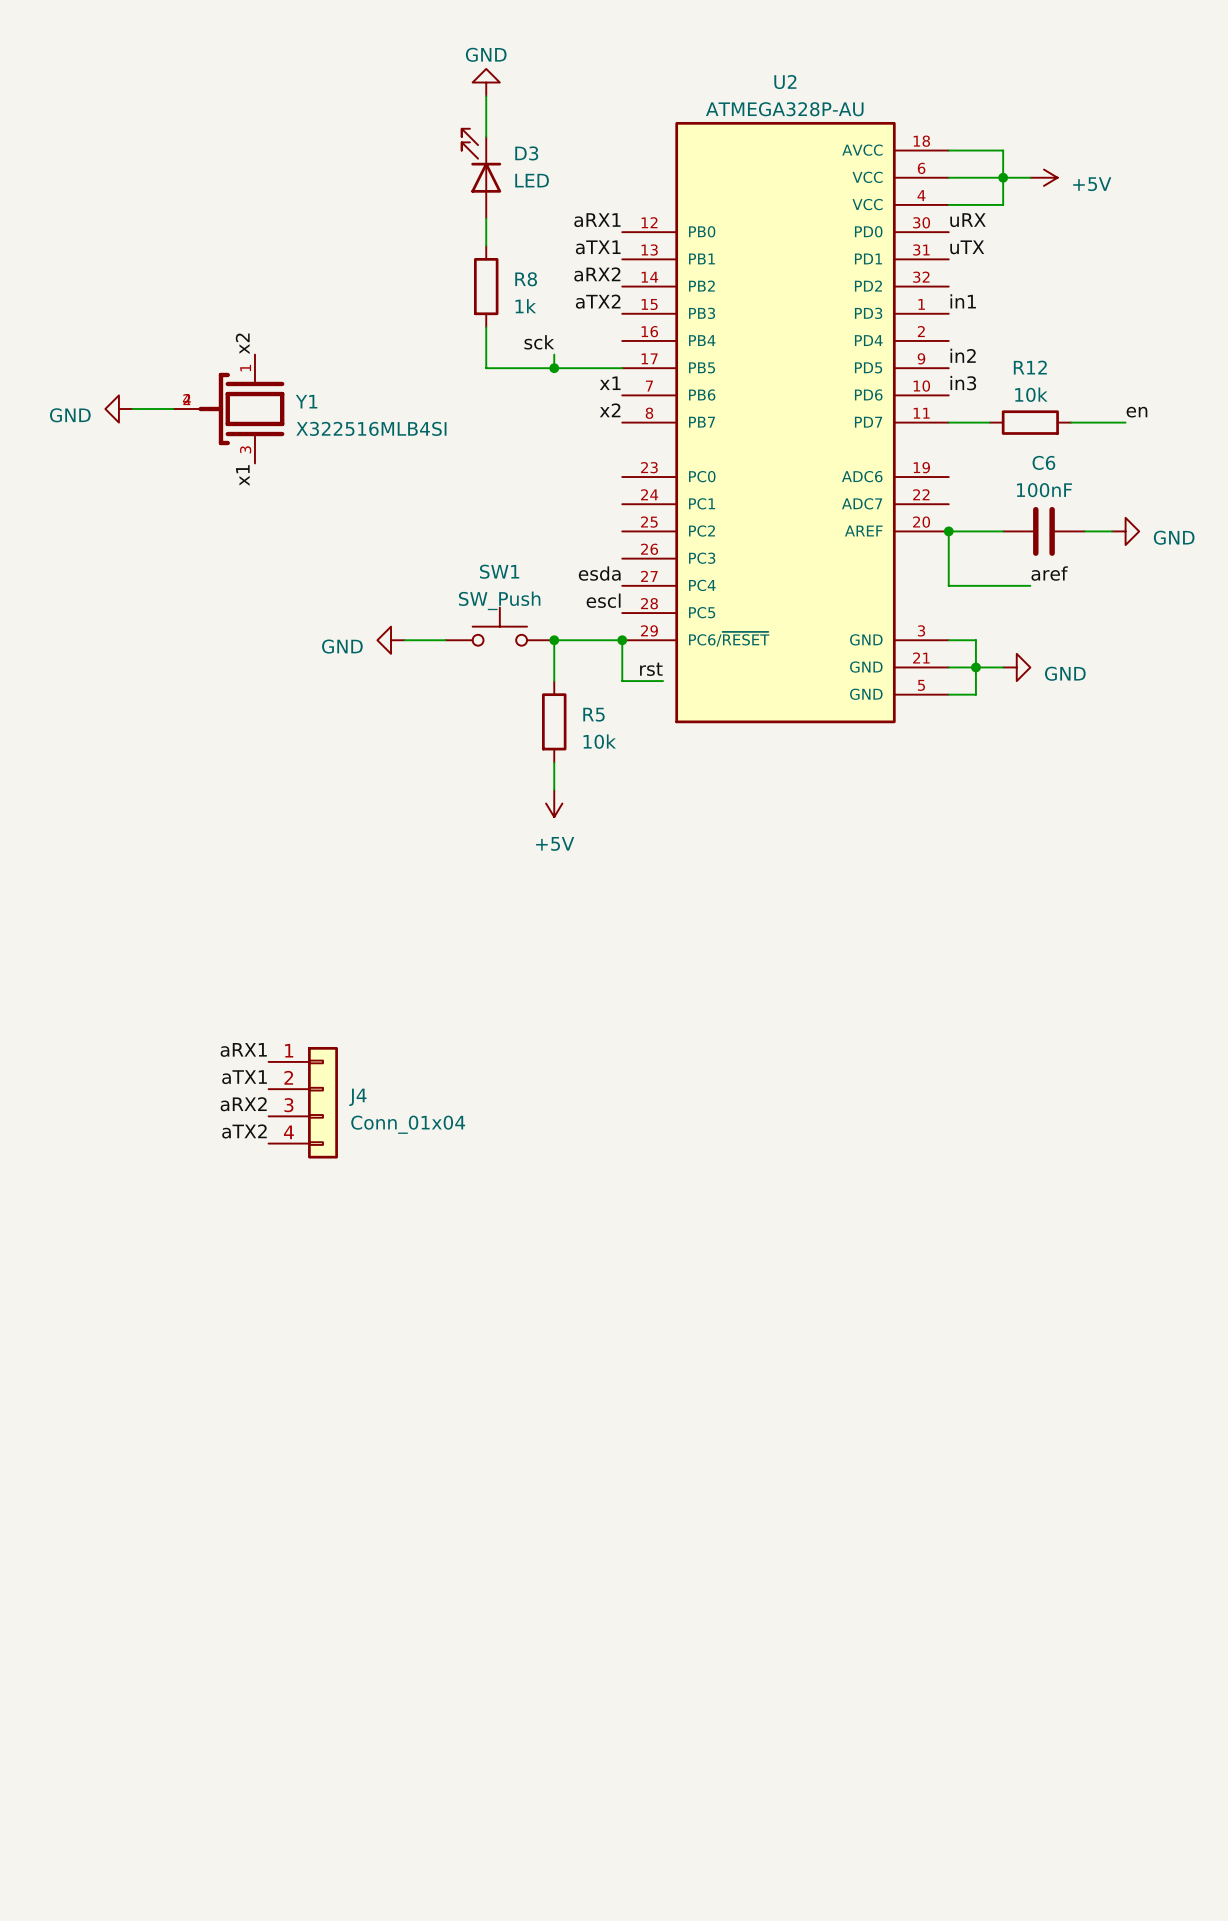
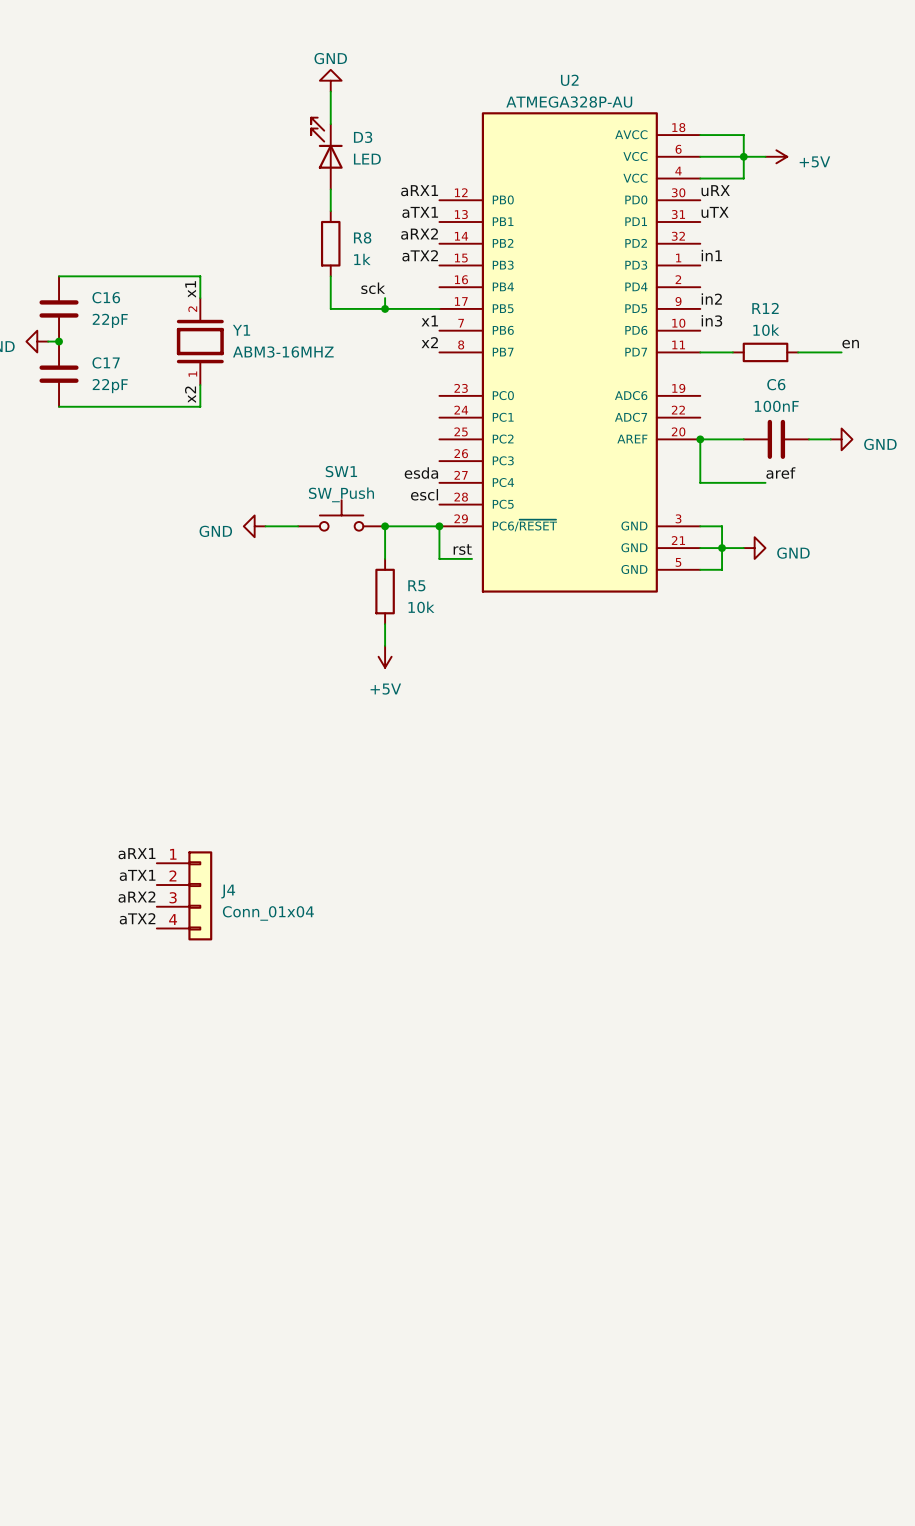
wire: none -> (59, 276) (200, 276) (200, 298)
label position: x2 (242, 343) -> x2 (190, 394)
Y1 symbol: [173, 354, 285, 464] -> [176, 298, 224, 386]
C16: none -> 22pF (59, 308)
Y1 name position: Y1 (306, 401) -> Y1 (241, 330)
wire: (146, 409) (173, 409) -> none
junction: none -> (59, 341)
Y1 value: X322516MLB4SI (371, 428) -> ABM3-16MHZ (283, 352)
C17: none -> 22pF (59, 374)
wire: none -> (200, 385) (200, 406) (59, 406)
label position: x1 (242, 475) -> x1 (190, 289)

